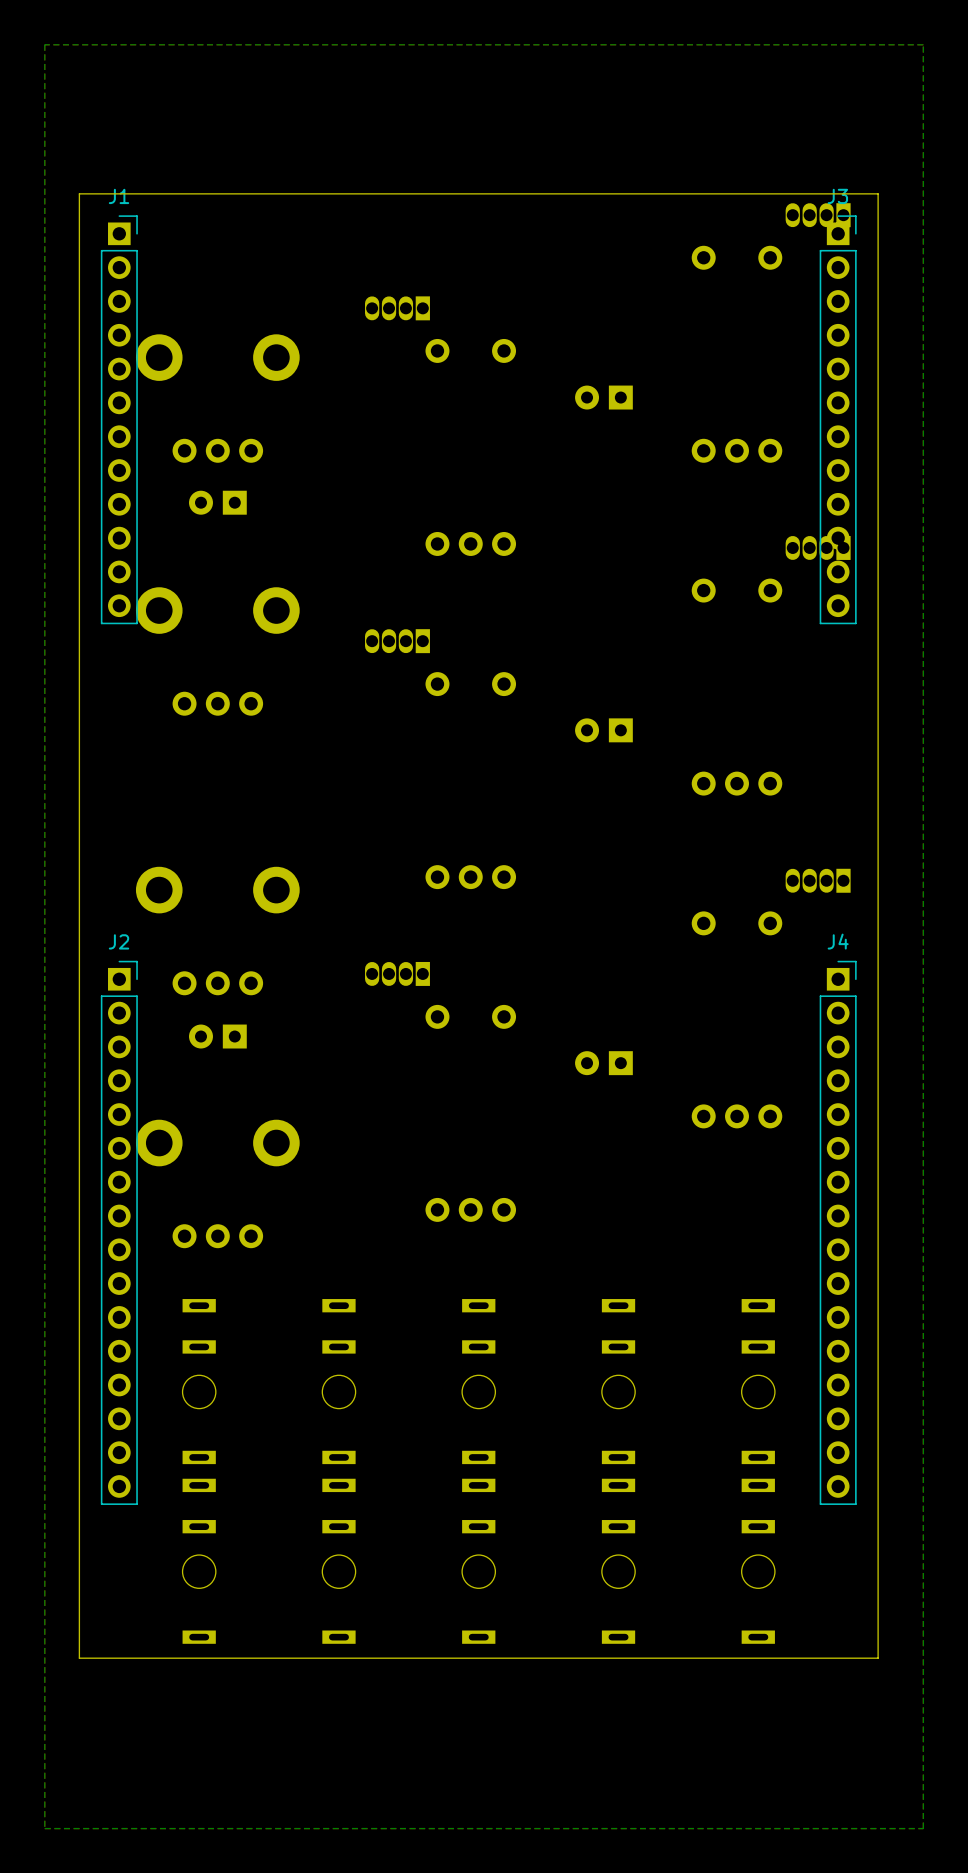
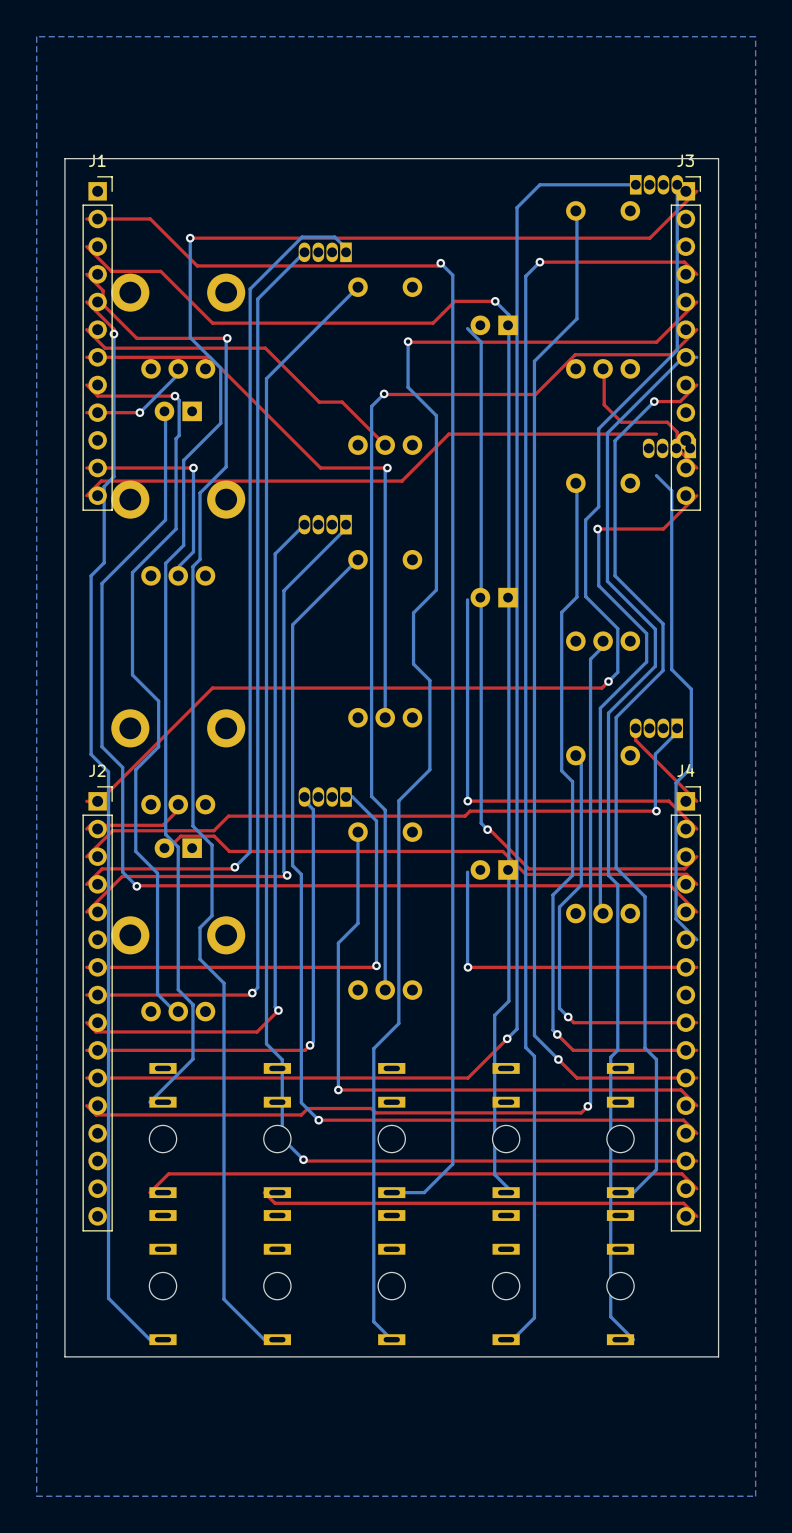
part rotation: 0° (818, 215) -> 180° (656, 184)
bottom track: none -> (635, 184) (539, 184) (517, 207) (517, 1029) (507, 1038)
bottom track: none -> (677, 184) (677, 350) (598, 428) (598, 506) (585, 519) (585, 596) (617, 628) (617, 672) (608, 681)
top track: none -> (696, 191) (649, 238) (190, 238)
bottom track: none -> (576, 215) (576, 318) (534, 361) (534, 1035) (558, 1059)
top track: none -> (86, 218) (150, 218) (197, 265) (438, 265) (440, 263)
bottom track: none -> (190, 238) (190, 337) (220, 368) (220, 423) (183, 460) (183, 545) (165, 563) (165, 834) (178, 847) (178, 989) (193, 1005) (192, 1059) (149, 1102)
via: none -> (190, 238)
top track: none -> (86, 246) (111, 271) (160, 271) (212, 323) (433, 323) (454, 301) (495, 301)
bottom track: none -> (304, 252) (257, 299) (257, 987) (252, 993)
bottom track: none -> (346, 252) (346, 248) (334, 237) (302, 237) (250, 289) (250, 851) (234, 867)
top track: none -> (539, 262) (684, 262) (696, 274)
bottom track: none -> (539, 262) (525, 276) (525, 1047) (534, 1056) (534, 1317) (512, 1339)
via: none -> (539, 262)
bottom track: none -> (440, 263) (452, 275) (452, 1164) (424, 1192) (391, 1192)
via: none -> (440, 263)
top track: none -> (86, 274) (103, 290) (103, 304) (136, 338) (227, 338)
bottom track: none -> (357, 287) (266, 378) (266, 1043) (282, 1059) (282, 1138) (303, 1159)
bottom track: none -> (495, 301) (508, 314) (508, 1001) (494, 1015) (494, 1174) (512, 1192)
via: none -> (495, 301)
top track: none -> (86, 301) (113, 329) (113, 334)
top track: none -> (696, 301) (656, 342) (408, 341)
bottom track: none -> (467, 328) (481, 342) (481, 823) (487, 829)
top track: none -> (86, 329) (105, 348) (265, 348) (319, 402) (342, 402) (385, 445)
top track: none -> (696, 329) (671, 354) (575, 354) (535, 394) (384, 393)
bottom track: none -> (113, 334) (113, 476) (104, 486) (104, 562) (91, 575) (91, 754) (108, 771) (108, 1298) (149, 1339)
via: none -> (113, 334)
bottom track: none -> (227, 338) (226, 466) (200, 493) (200, 559) (192, 566) (192, 826) (212, 845) (212, 915) (200, 927) (200, 959) (224, 983) (224, 1299) (264, 1339)
via: none -> (227, 338)
bottom track: none -> (408, 341) (408, 387) (436, 415) (436, 590) (413, 612) (413, 664) (429, 680) (429, 769) (398, 800) (398, 1023) (373, 1048) (373, 1321) (391, 1339)
via: none -> (408, 341)
top track: none -> (86, 357) (209, 357) (320, 468) (387, 468)
bottom track: none -> (696, 357) (683, 357) (607, 433) (607, 581) (655, 629) (655, 666) (608, 713) (608, 875) (617, 884) (617, 1050) (610, 1057) (610, 1316) (633, 1339)
bottom track: none -> (179, 373) (139, 412)
top track: none -> (604, 373) (604, 404) (621, 422) (667, 422) (677, 432) (677, 448) (696, 468)
top track: none -> (86, 385) (97, 396) (174, 396)
top track: none -> (696, 385) (680, 401) (654, 401)
bottom track: none -> (384, 393) (371, 406) (371, 796) (385, 810) (385, 989)
via: none -> (384, 393)
bottom track: none -> (174, 396) (179, 400) (179, 435) (176, 438) (176, 529) (132, 572) (132, 674) (158, 701) (158, 746) (135, 769) (135, 851) (157, 873) (157, 994) (179, 1015)
via: none -> (174, 396)
bottom track: none -> (654, 401) (615, 440) (615, 575) (662, 623) (662, 670) (616, 717) (616, 867) (645, 896) (645, 1048) (656, 1059) (656, 1169) (633, 1192)
via: none -> (654, 401)
top track: none -> (139, 412) (86, 412)
via: none -> (139, 412)
bottom track: none -> (165, 415) (165, 519) (102, 583) (102, 746) (122, 767) (122, 872) (136, 886)
top track: none -> (656, 434) (448, 434) (401, 481) (101, 481) (86, 495)
top track: none -> (193, 468) (86, 468)
bottom track: none -> (193, 468) (193, 551) (179, 566) (179, 580)
via: none -> (193, 468)
bottom track: none -> (387, 468) (385, 470) (385, 717)
via: none -> (387, 468)
bottom track: none -> (656, 475) (671, 490) (671, 669) (691, 689) (691, 767) (676, 782) (676, 918) (696, 939)
bottom track: none -> (576, 487) (576, 597) (561, 612) (561, 770) (572, 781) (572, 875) (552, 895) (552, 1030) (557, 1034)
top track: none -> (696, 495) (663, 529) (597, 529)
bottom track: none -> (304, 524) (275, 553) (275, 1007) (278, 1010)
bottom track: none -> (346, 524) (346, 528) (283, 590) (283, 872) (287, 875)
bottom track: none -> (597, 529) (598, 585) (646, 633) (646, 661) (600, 708) (600, 914) (604, 917)
via: none -> (597, 529)
bottom track: none -> (357, 559) (292, 624) (292, 865) (301, 874) (301, 1102) (318, 1120)
bottom track: none -> (467, 599) (467, 801)
bottom track: none -> (604, 645) (590, 659) (590, 1103) (587, 1106)
top track: none -> (608, 681) (601, 688) (212, 688) (99, 801) (86, 801)
via: none -> (608, 681)
part position: (818, 880) -> (656, 728)
top track: none -> (635, 728) (635, 740) (696, 801)
bottom track: none -> (677, 728) (677, 732) (655, 754) (656, 811)
bottom track: none -> (576, 759) (581, 764) (581, 885) (559, 907) (559, 1008) (568, 1017)
bottom track: none -> (304, 796) (313, 809) (313, 1042) (310, 1045)
bottom track: none -> (346, 796) (352, 796) (376, 820) (376, 965)
top track: none -> (467, 801) (668, 801) (696, 829)
via: none -> (467, 801)
top track: none -> (179, 808) (163, 825) (90, 825) (86, 829)
top track: none -> (656, 811) (470, 811) (465, 816) (228, 816) (213, 830) (112, 830) (86, 856)
via: none -> (656, 811)
top track: none -> (487, 829) (529, 868) (684, 868) (696, 856)
via: none -> (487, 829)
bottom track: none -> (357, 831) (357, 923) (338, 943) (338, 1090)
top track: none -> (164, 852) (180, 836) (214, 836) (229, 851) (502, 851) (525, 874) (686, 874) (696, 884)
top track: none -> (234, 867) (233, 868) (102, 868) (86, 884)
via: none -> (234, 867)
bottom track: none -> (467, 872) (468, 967)
top track: none -> (287, 875) (122, 876) (86, 912)
via: none -> (287, 875)
top track: none -> (136, 886) (670, 885) (696, 912)
via: none -> (136, 886)
top track: none -> (376, 965) (374, 967) (86, 967)
via: none -> (376, 965)
via: none -> (468, 967)
top track: none -> (696, 967) (468, 967)
top track: none -> (252, 993) (250, 995) (86, 995)
via: none -> (252, 993)
top track: none -> (278, 1010) (257, 1031) (96, 1031) (86, 1022)
via: none -> (278, 1010)
top track: none -> (568, 1017) (573, 1022) (696, 1022)
via: none -> (568, 1017)
top track: none -> (557, 1034) (573, 1050) (696, 1050)
via: none -> (557, 1034)
top track: none -> (507, 1038) (468, 1078) (86, 1078)
via: none -> (507, 1038)
top track: none -> (310, 1045) (305, 1050) (86, 1050)
via: none -> (310, 1045)
top track: none -> (558, 1059) (576, 1078) (696, 1078)
via: none -> (558, 1059)
top track: none -> (338, 1090) (681, 1090) (696, 1105)
via: none -> (338, 1090)
top track: none -> (86, 1105) (96, 1114) (301, 1114) (307, 1108) (371, 1108) (375, 1112) (581, 1112) (587, 1106)
via: none -> (587, 1106)
top track: none -> (318, 1120) (683, 1120) (696, 1133)
via: none -> (318, 1120)
top track: none -> (303, 1159) (696, 1161)
via: none -> (303, 1159)
top track: none -> (696, 1188) (681, 1173) (168, 1173) (149, 1192)
top track: none -> (264, 1192) (274, 1203) (683, 1203) (696, 1216)

